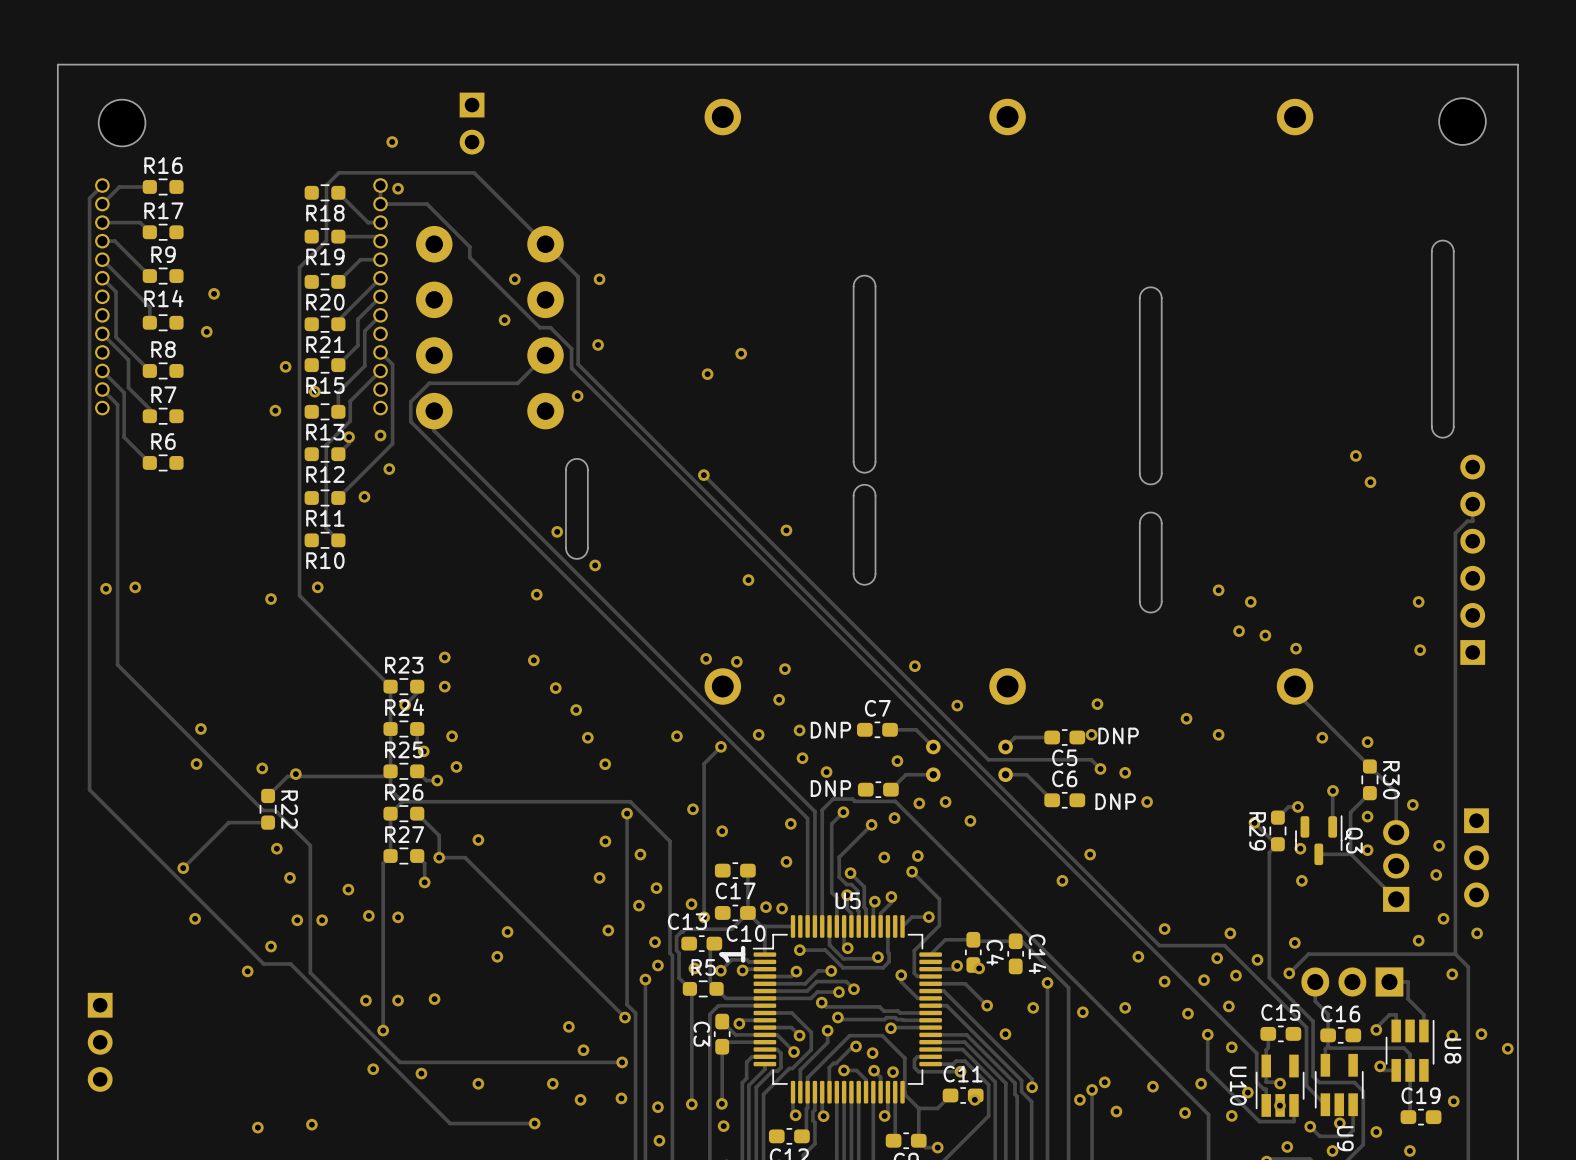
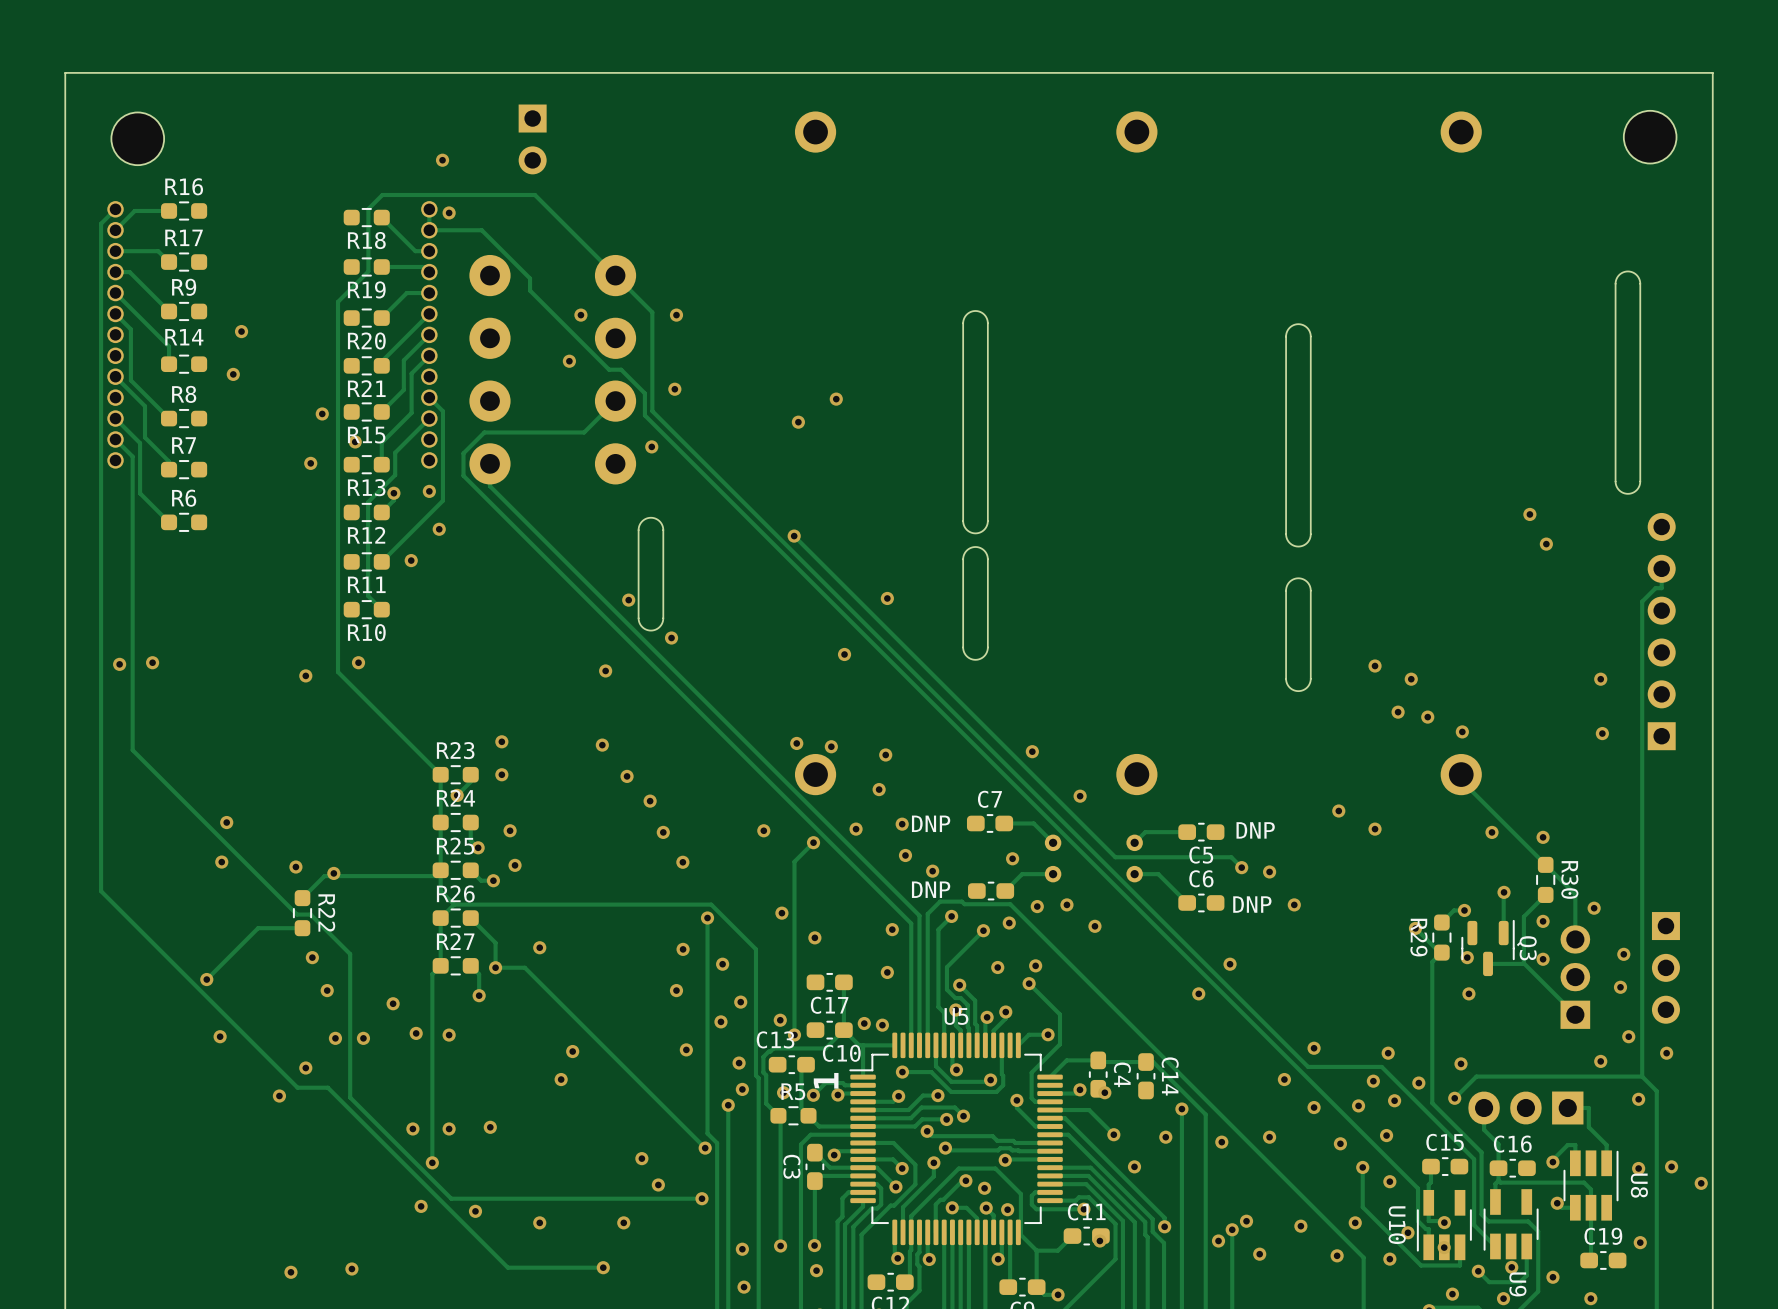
via: (1097, 704) -> none
via: (1091, 734) -> none
part: (100, 1042) -> none
via: (621, 1098) -> none
via: (580, 1099) -> none

